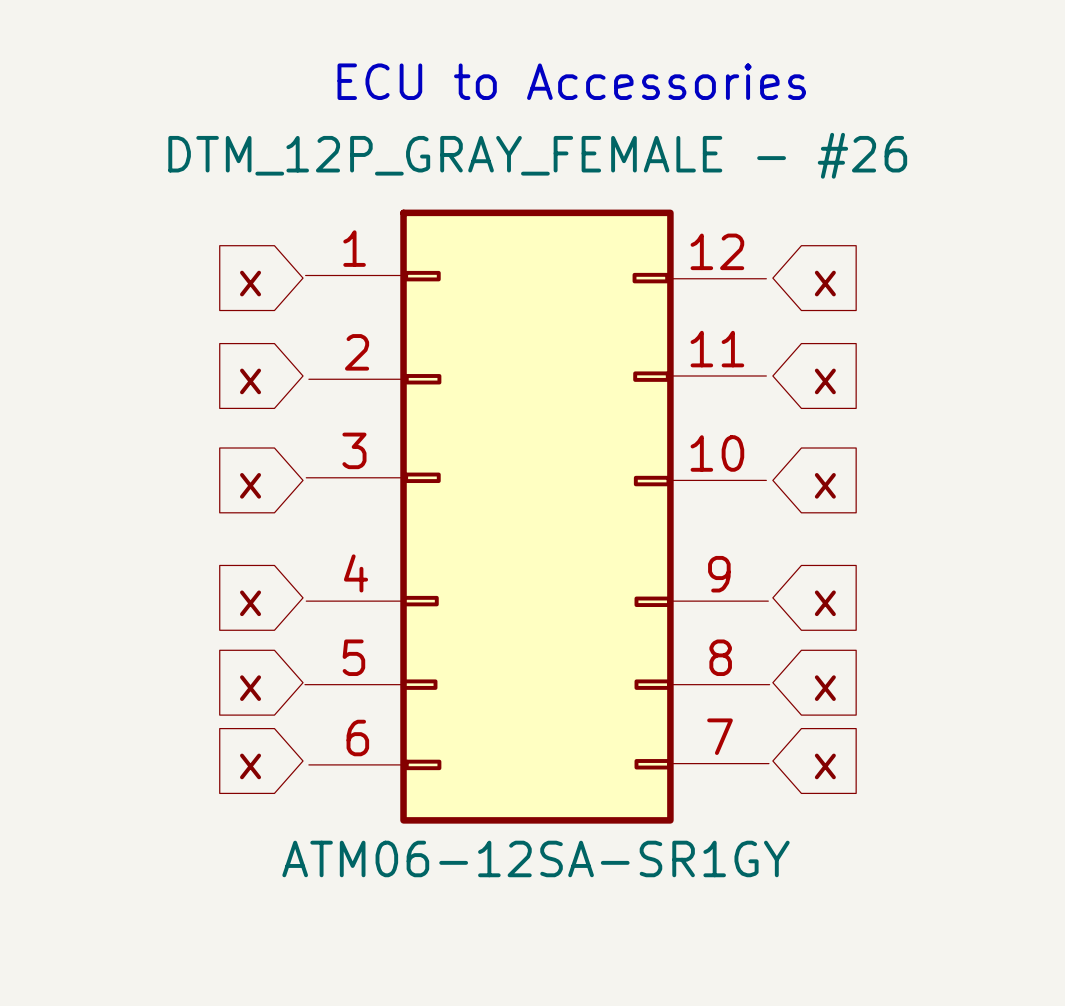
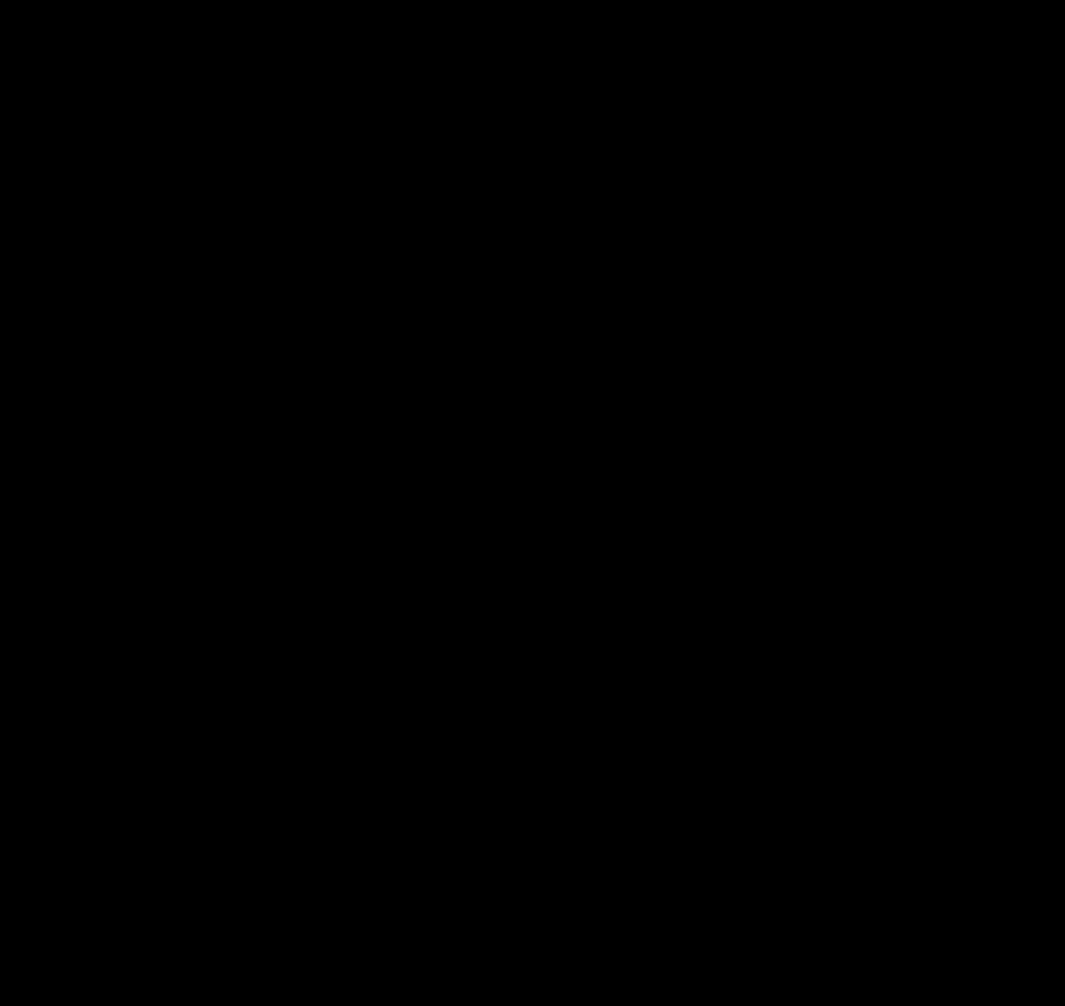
text: ECU to Accessories (571, 81) -> none
global label: x (250, 283) -> none
global label: x (825, 283) -> none
global label: x (250, 381) -> none
global label: x (825, 381) -> none
global label: x (250, 485) -> none
global label: x (825, 485) -> none
part: DTM_12P_GRAY_FEMALE - #26 (537, 516) -> none
global label: x (250, 603) -> none
global label: x (825, 603) -> none
global label: x (250, 688) -> none
global label: x (825, 688) -> none
global label: x (250, 766) -> none
global label: x (825, 766) -> none

